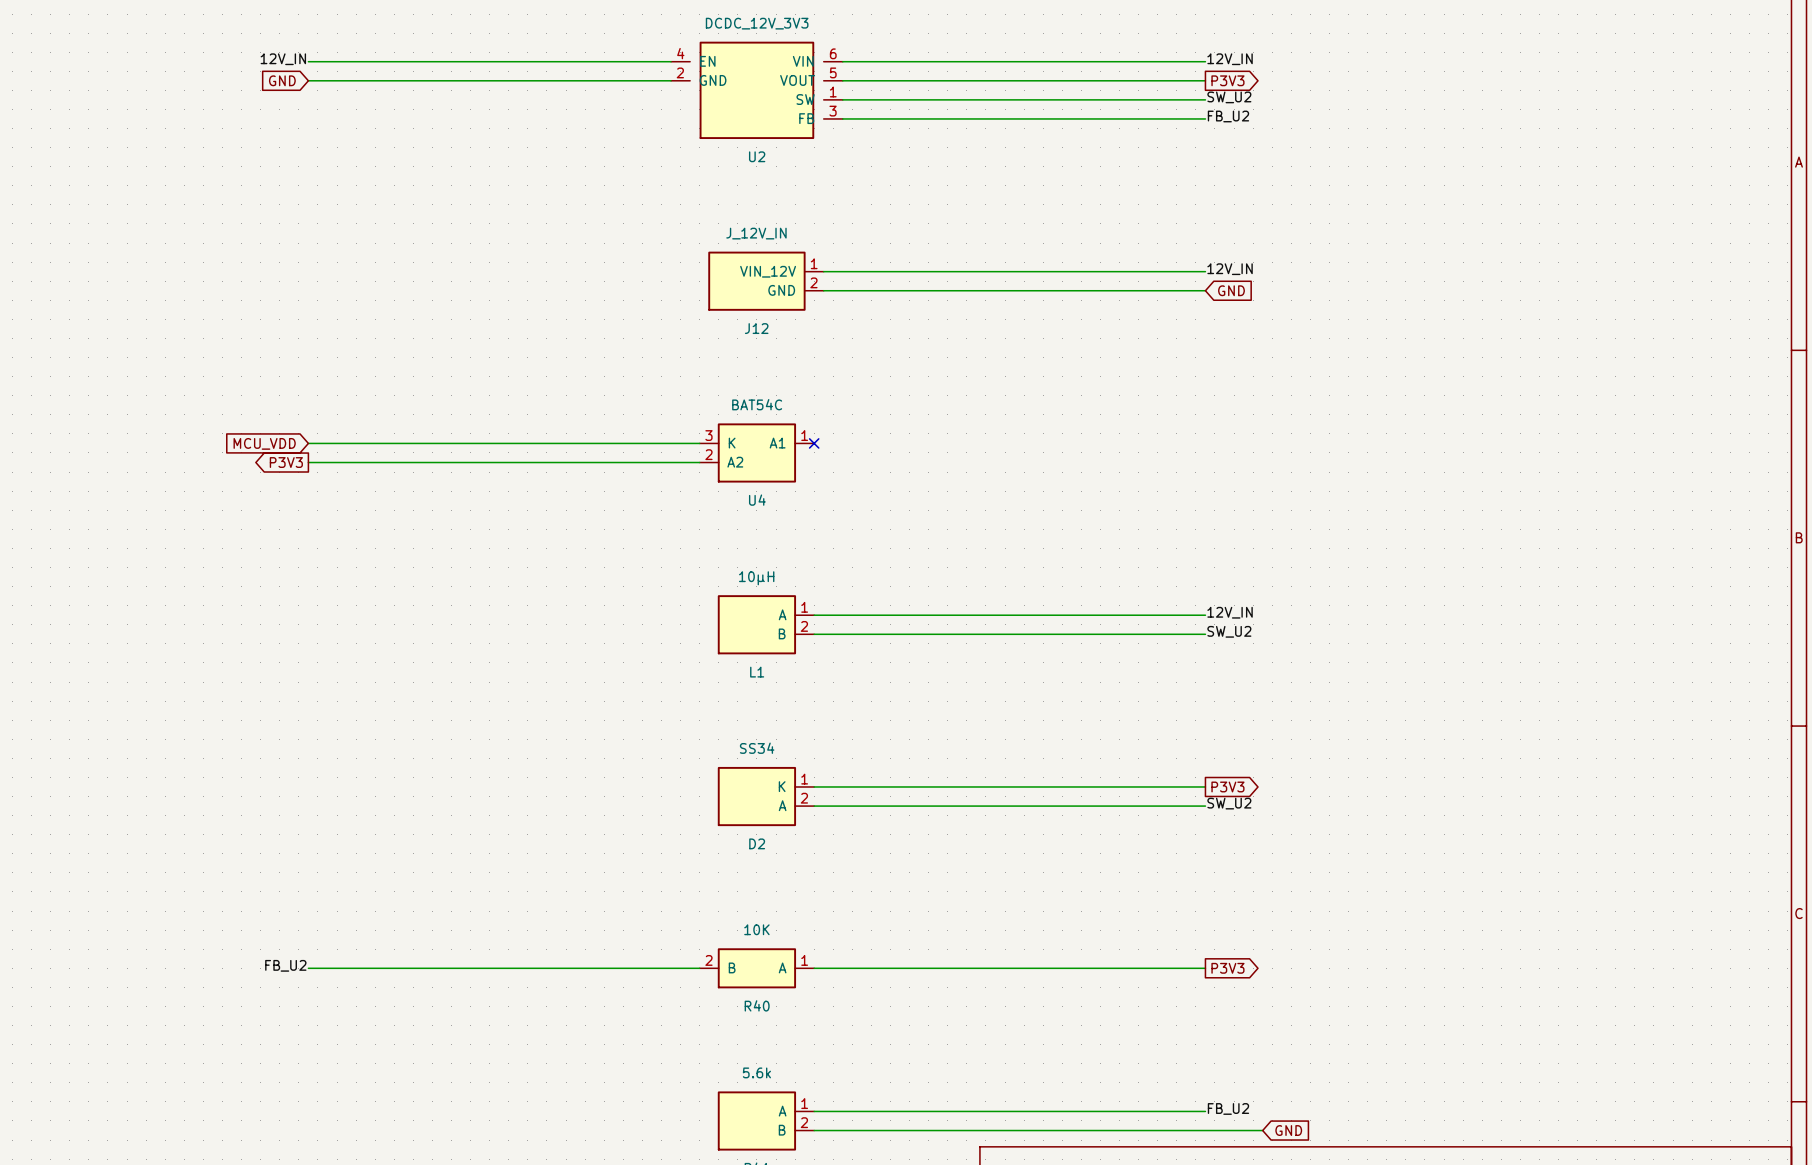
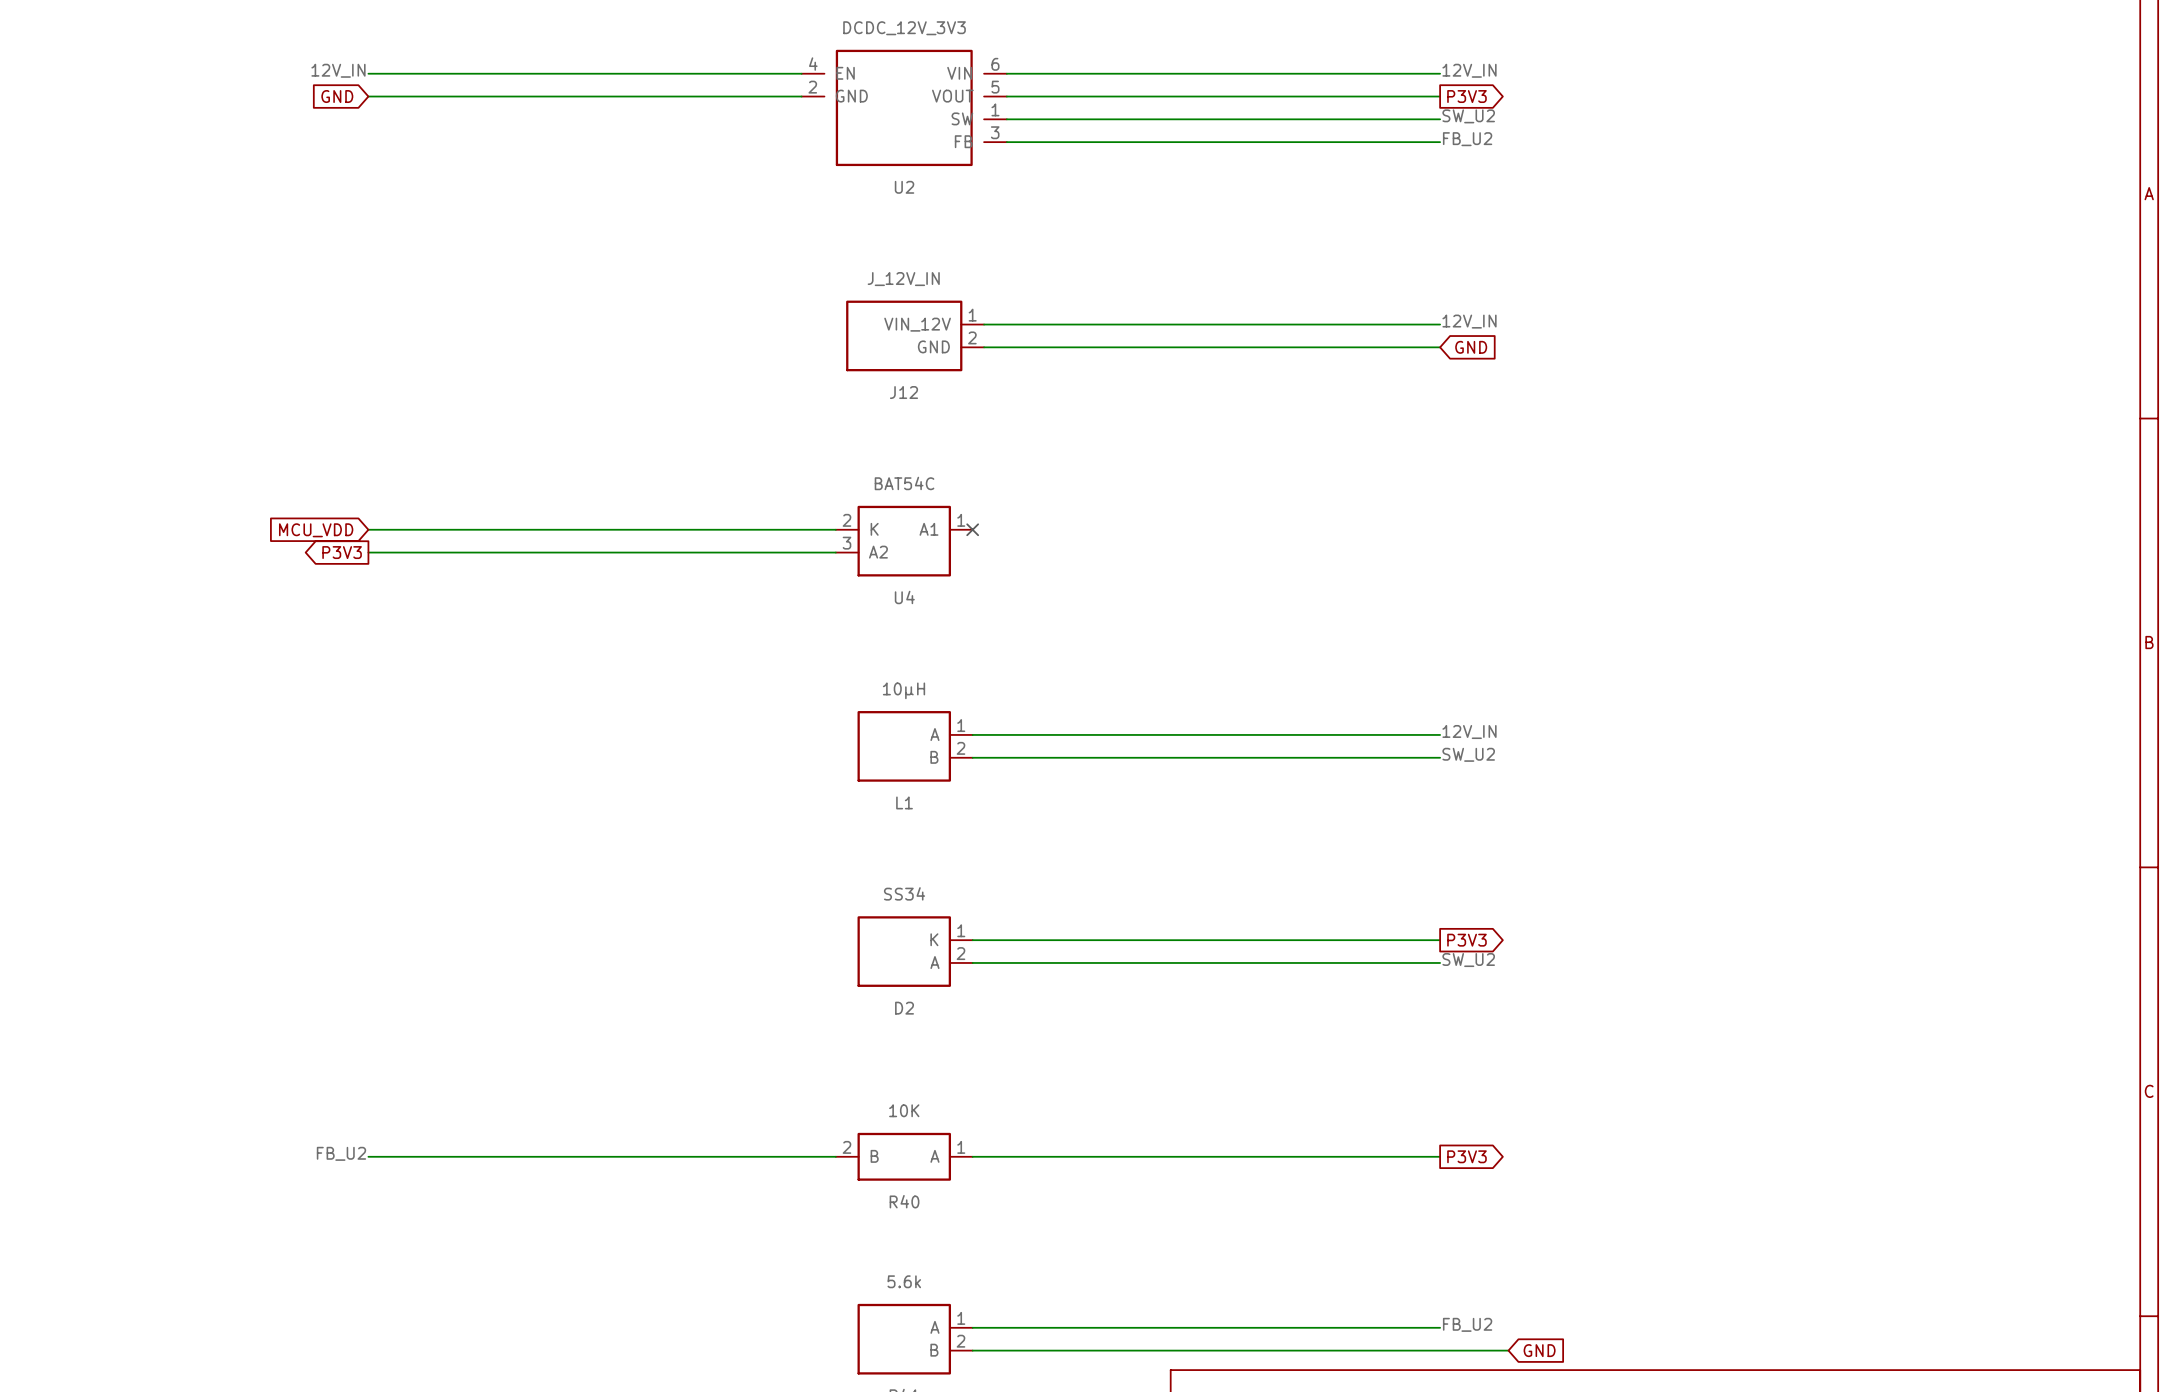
U4 pin number: 3 (708, 435) -> 2 (846, 520)
U4 pin number: 2 (708, 454) -> 3 (846, 543)

